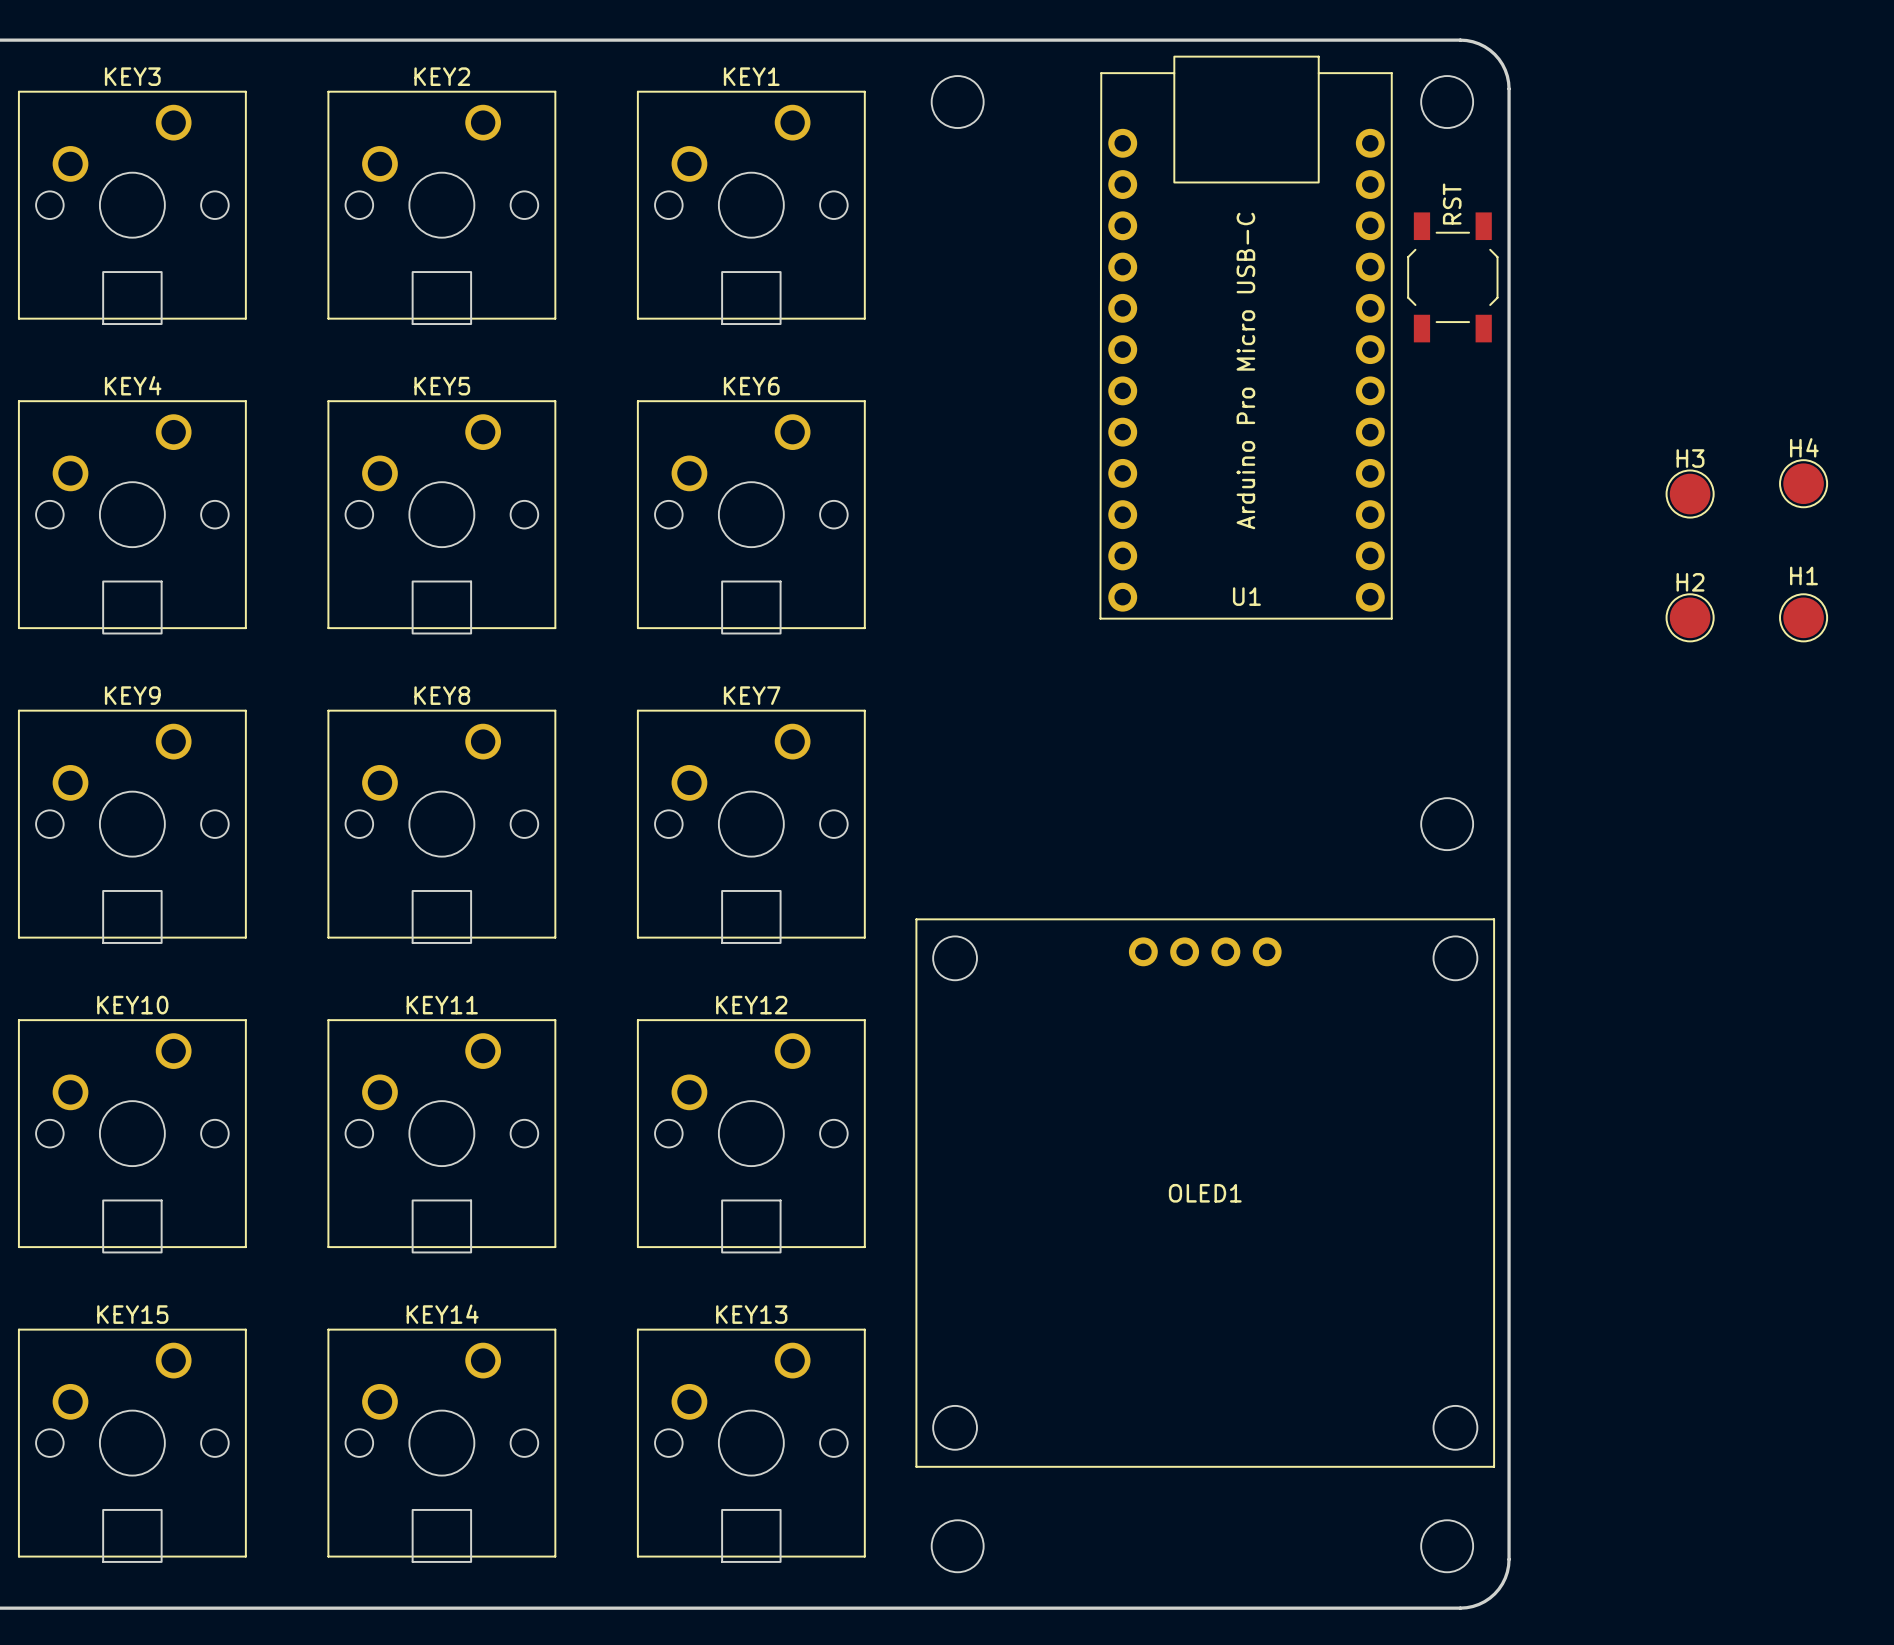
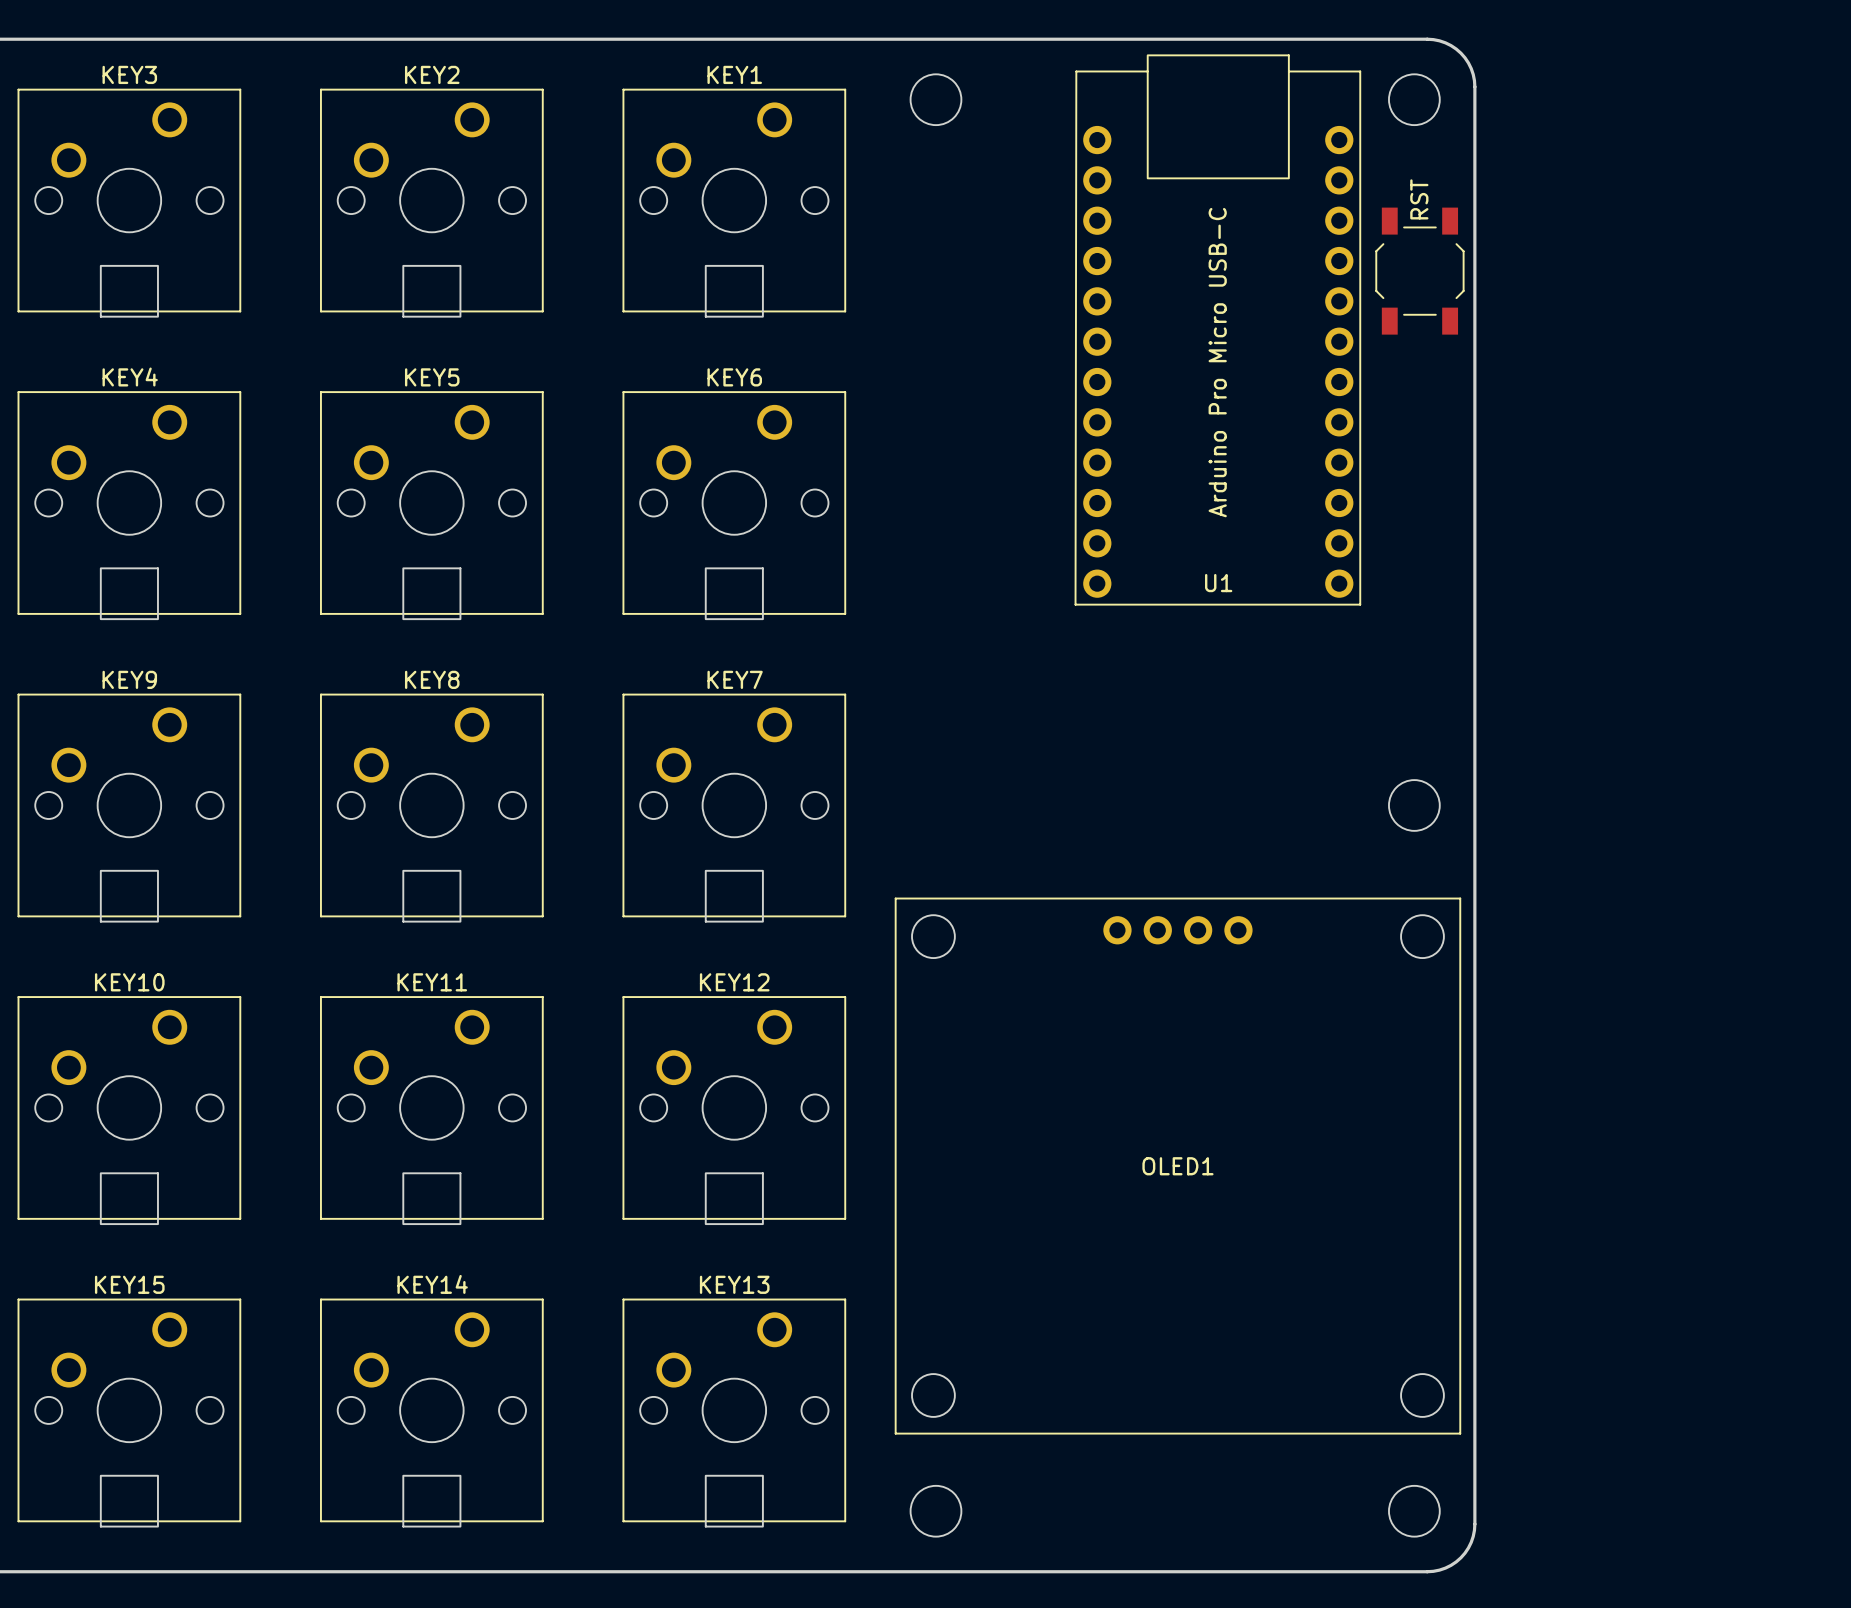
H4: (1803, 483) -> none
H3: (1690, 494) -> none
H2: (1690, 617) -> none
H1: (1803, 617) -> none

